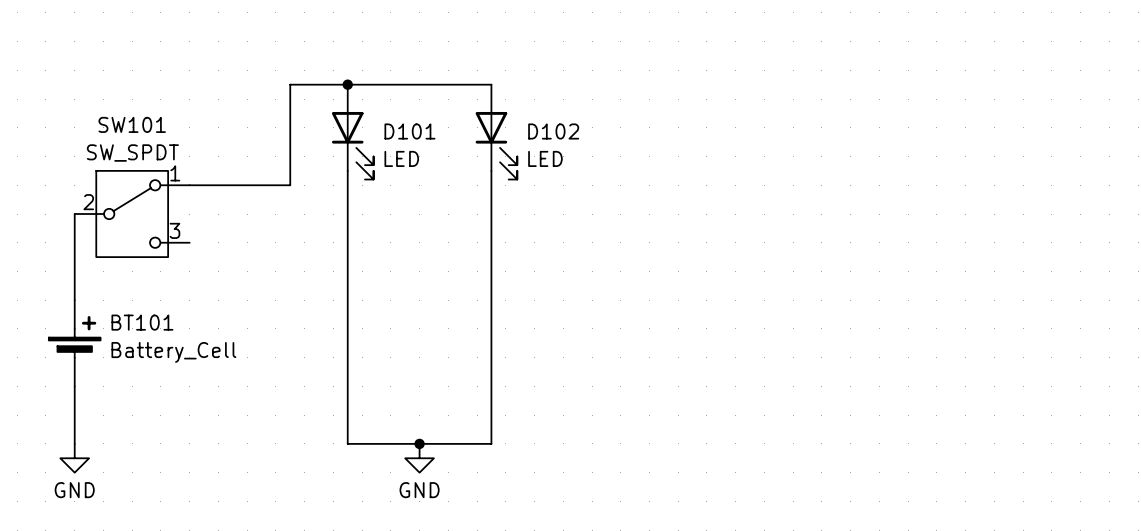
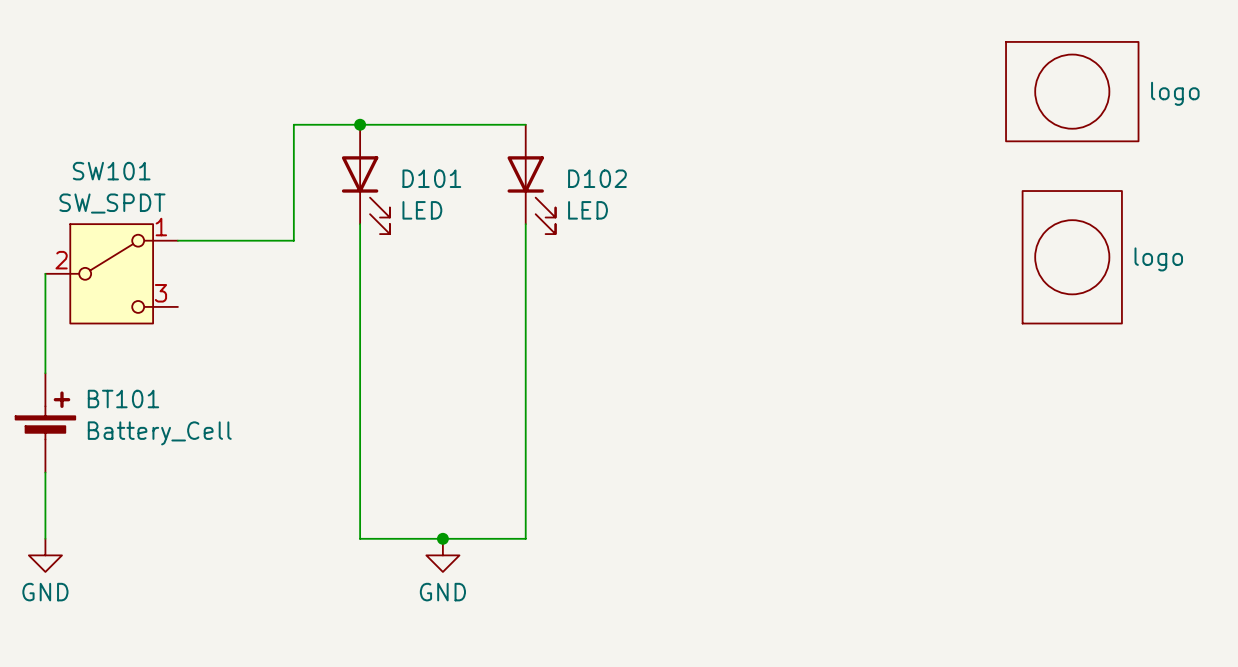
part: none -> logo (1072, 91)
part: none -> logo (1072, 257)

